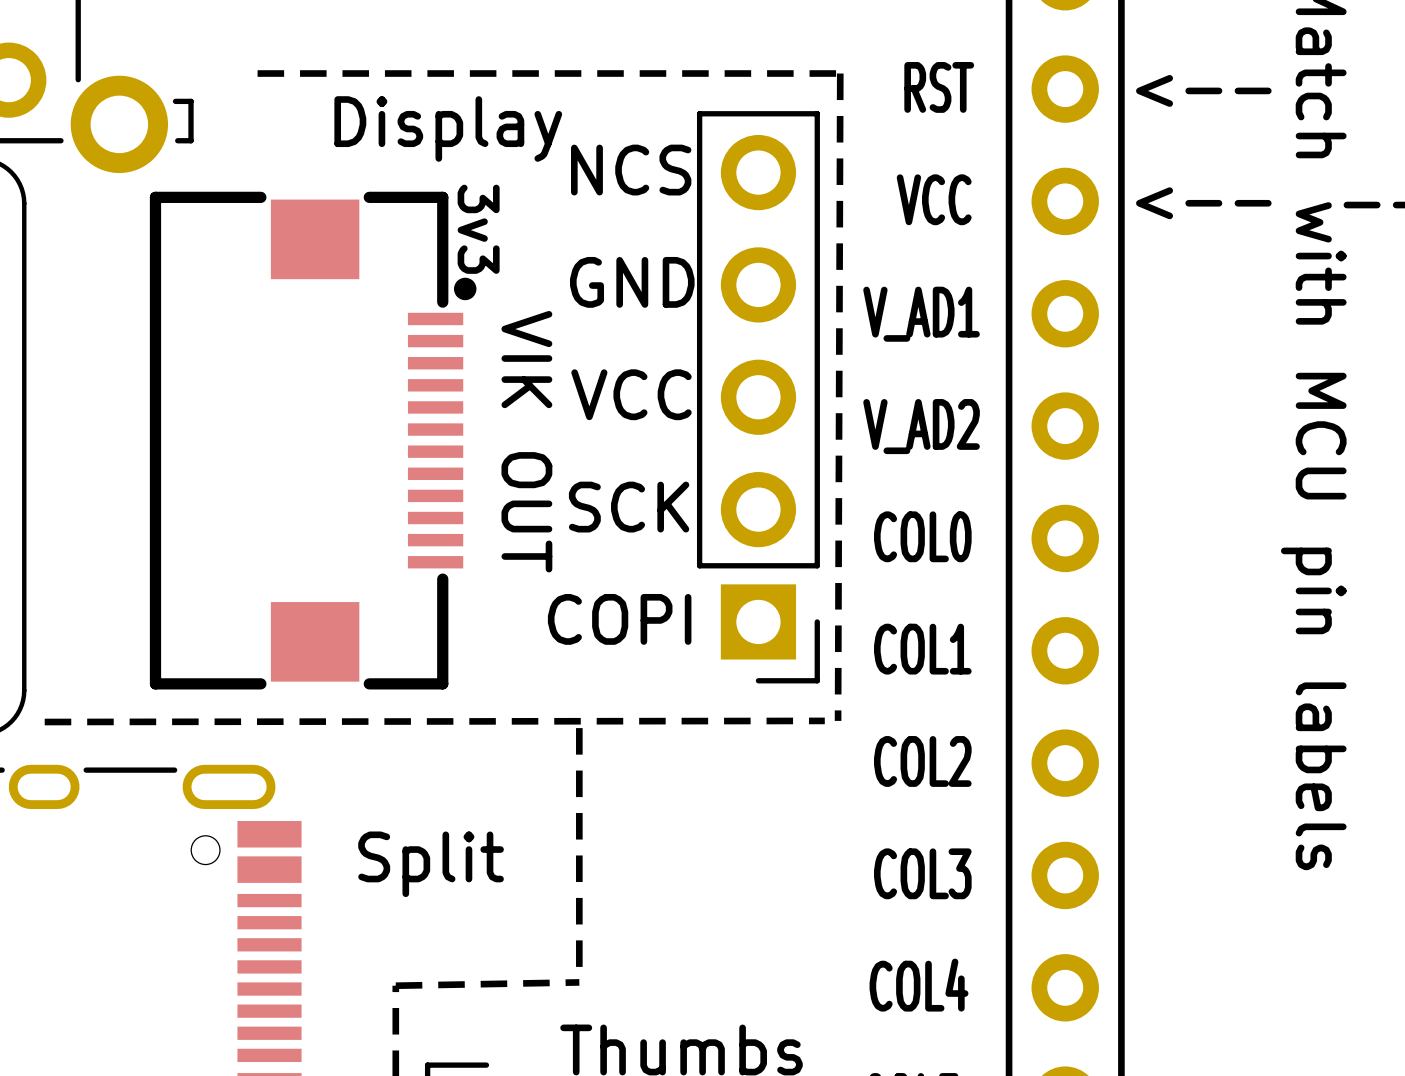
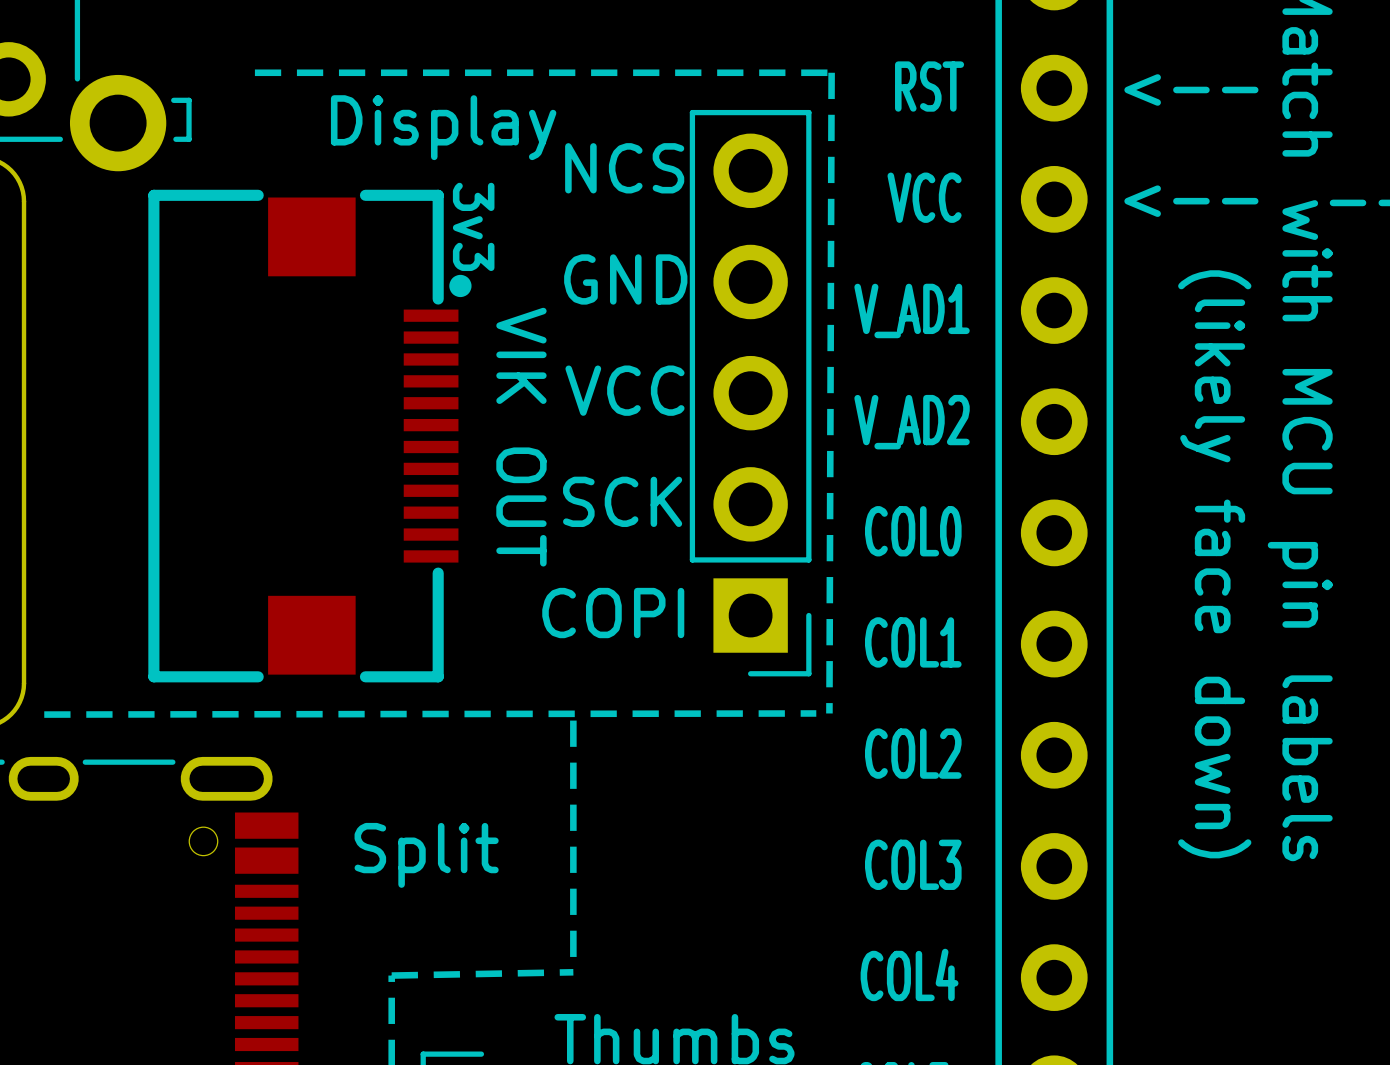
text: none -> (likely face down) (1214, 564)

